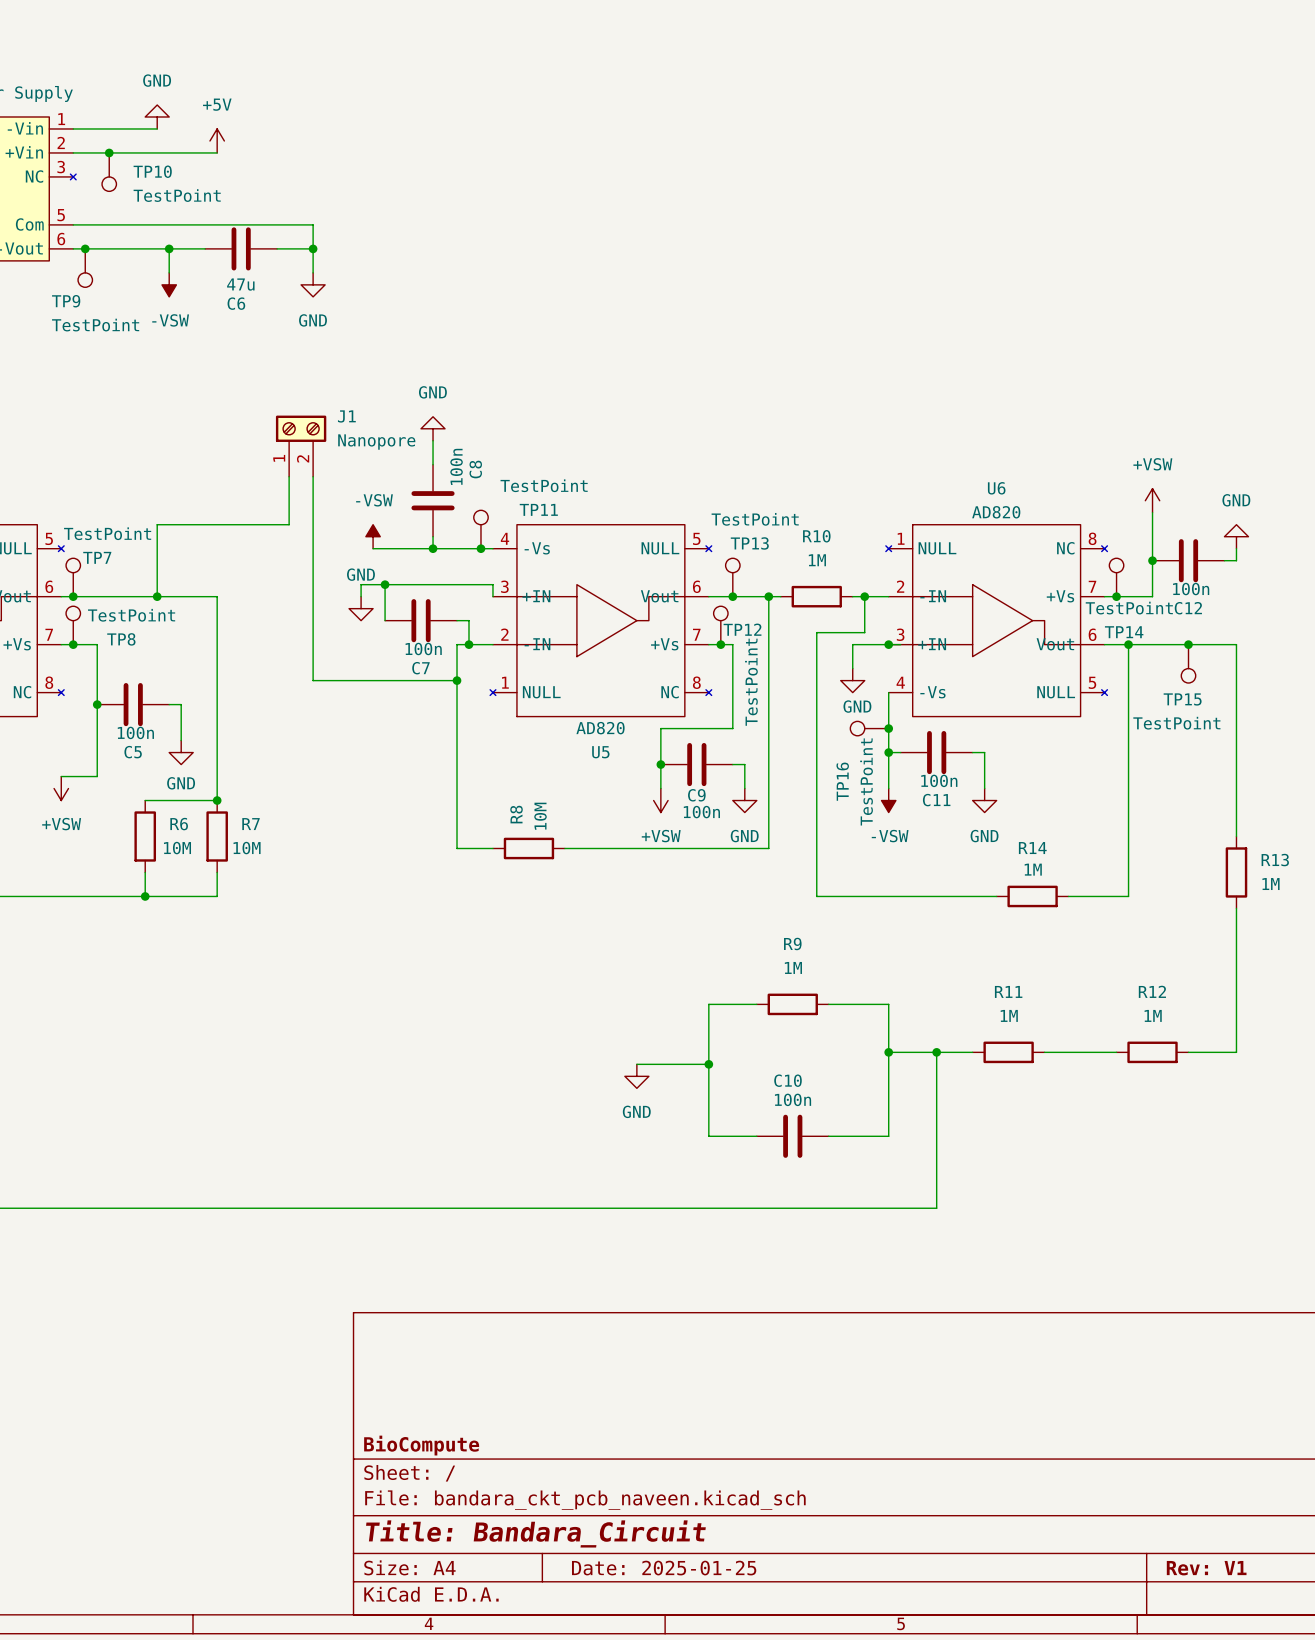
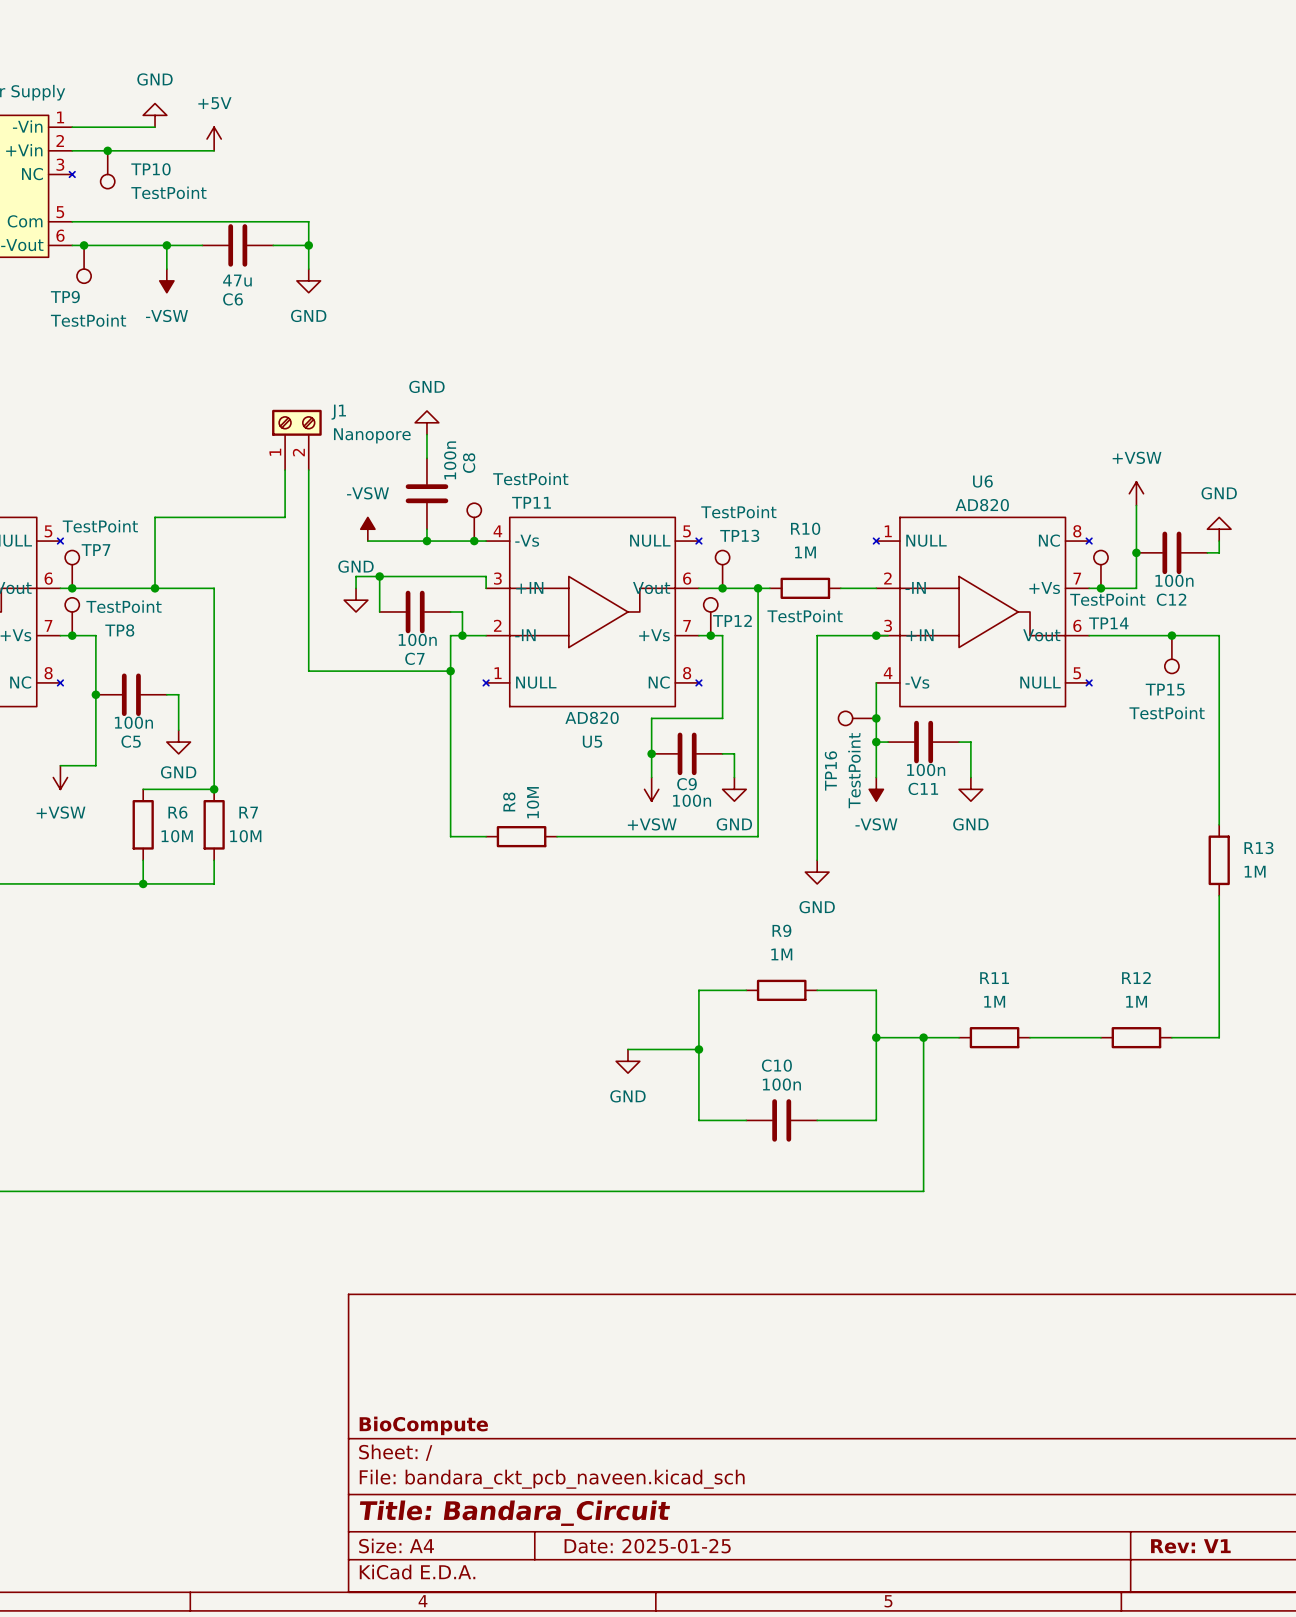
wire: (864, 596) (864, 632) (816, 632) (816, 896) (996, 896) -> none
junction: (864, 596) -> none
wire: (852, 644) (852, 668) -> (840, 635) (817, 635) (817, 860)
wire: (1128, 644) (1128, 896) (1068, 896) -> none
junction: (1128, 644) -> none
power symbol position: GND (852, 680) -> GND (817, 872)
TP12 value rotation: 0° (751, 682) -> 90° clockwise (805, 616)
power symbol text position: GND (857, 706) -> GND (817, 907)
R14: 1M (1032, 896) -> none

